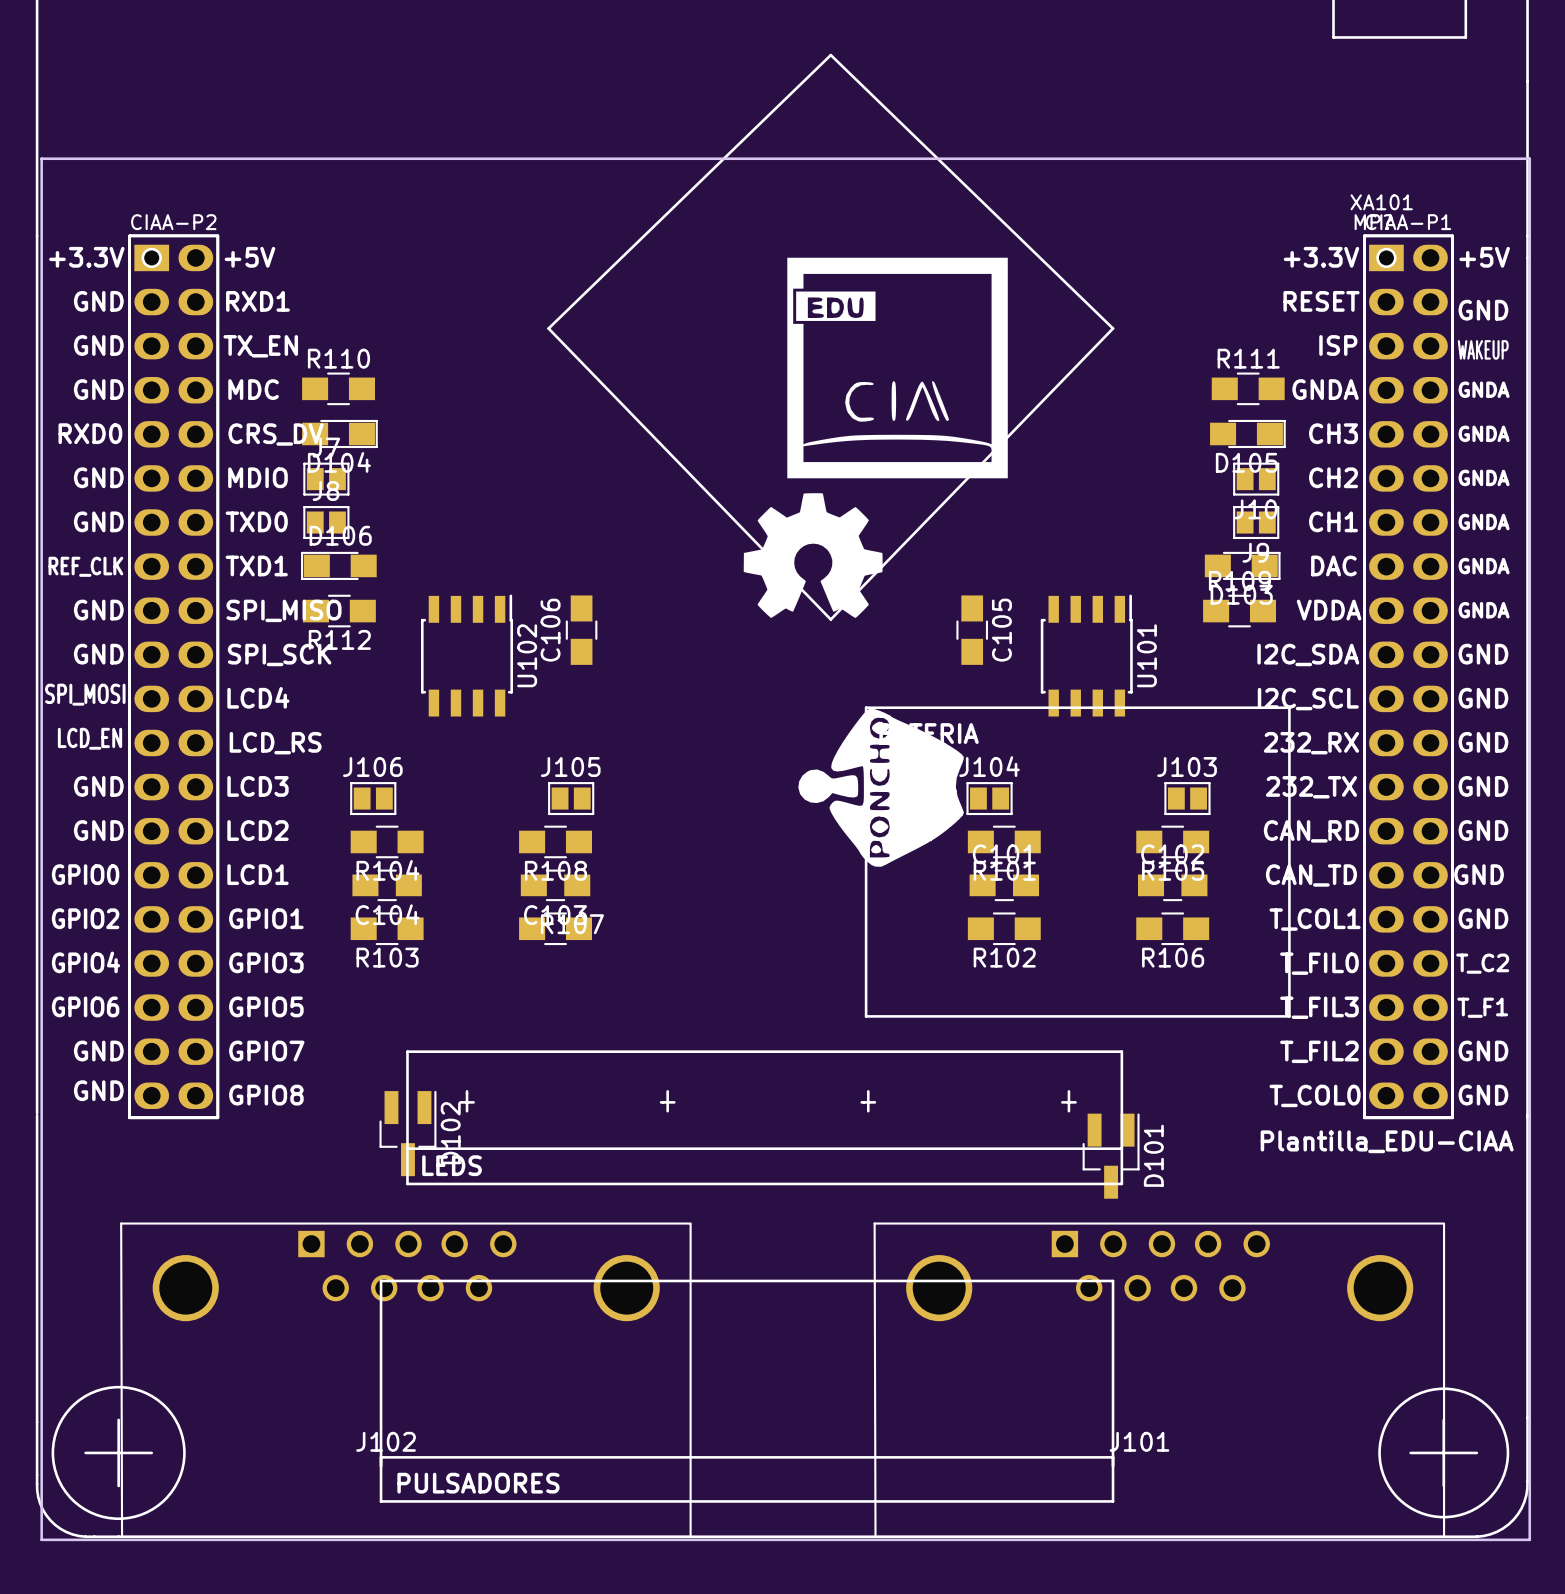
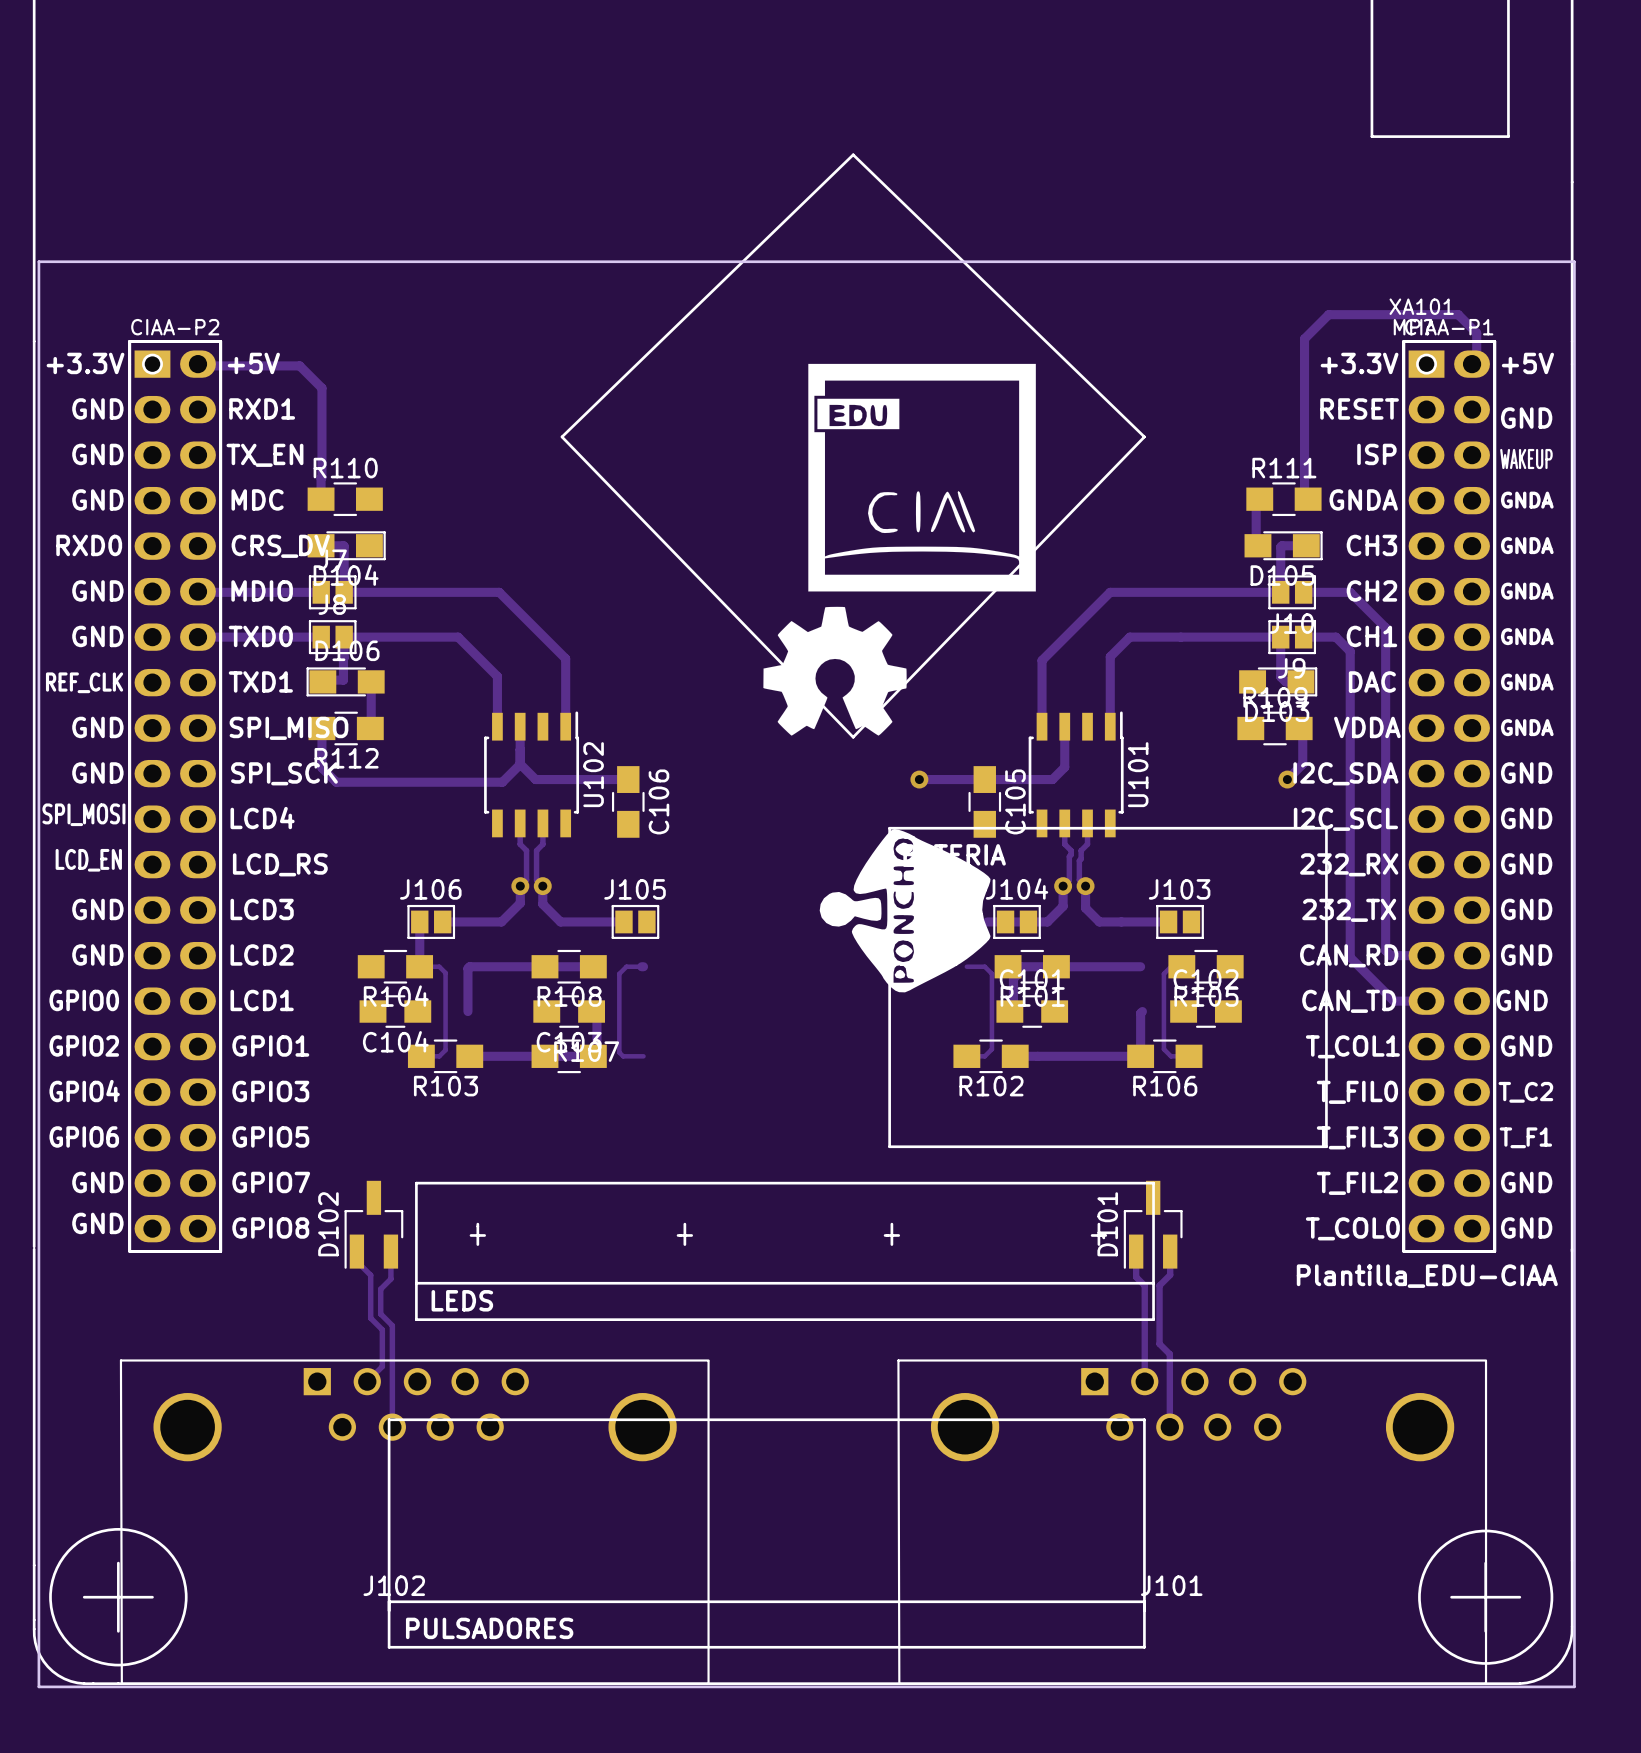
track: none -> (202, 365) (299, 365) (321, 388) (321, 499)
track: none -> (1476, 365) (1476, 333) (1458, 314) (1328, 314) (1304, 338) (1304, 499)
track: none -> (1256, 499) (1256, 545)
track: none -> (321, 545) (344, 546) (344, 592) (499, 592) (565, 658) (565, 726)
track: none -> (1304, 545) (1280, 547) (1280, 592) (1110, 592) (1042, 660) (1042, 726)
track: none -> (321, 592) (202, 593)
track: none -> (1303, 592) (1350, 592) (1385, 627) (1385, 950) (1390, 955) (1426, 955)
track: none -> (321, 637) (204, 637) (202, 638)
track: none -> (1303, 637) (1335, 637) (1350, 651) (1350, 957) (1393, 1001) (1426, 1001)
track: none -> (322, 681) (324, 680) (343, 680) (344, 637) (458, 637) (497, 676) (497, 726)
track: none -> (371, 681) (370, 728)
track: none -> (1300, 681) (1285, 681) (1280, 676) (1280, 637) (1129, 637) (1110, 656) (1110, 726)
track: none -> (520, 726) (520, 764) (502, 782) (336, 782) (321, 767) (321, 728)
track: none -> (1064, 726) (1064, 767) (1052, 779) (919, 779)
track: none -> (1302, 728) (1302, 764) (1287, 779)
C106 name position: C106 (550, 630) -> C106 (658, 801)
C106 position: (581, 630) -> (628, 801)
C105 position: (972, 630) -> (984, 801)
track: none -> (520, 764) (535, 779) (628, 779)
U102 position: (467, 655) -> (531, 774)
U101 position: (1086, 655) -> (1076, 774)
via: none -> (919, 779)
via: none -> (1287, 779)
track: none -> (520, 823) (520, 844) (526, 850) (526, 879) (520, 886) (520, 903) (501, 921) (442, 921)
track: none -> (542, 823) (542, 844) (536, 850) (536, 879) (542, 886) (542, 904) (560, 921) (623, 921)
track: none -> (1064, 823) (1064, 844) (1071, 850) (1071, 854) (1069, 856) (1069, 879) (1063, 886) (1063, 906) (1047, 921) (987, 921)
track: none -> (1087, 823) (1087, 844) (1081, 850) (1079, 860) (1079, 879) (1085, 886) (1085, 908) (1099, 921) (1168, 921)
via: none -> (520, 886)
via: none -> (542, 886)
via: none -> (1063, 886)
via: none -> (1085, 886)
J106 position: (373, 798) -> (431, 921)
track: none -> (419, 921) (419, 965) (439, 966) (445, 972) (445, 1050) (439, 1056) (421, 1056)
J105 position: (571, 798) -> (635, 921)
J103 position: (1187, 798) -> (1180, 921)
track: none -> (595, 966) (469, 966) (467, 968) (467, 1011)
track: none -> (641, 966) (643, 966) (626, 966) (619, 973) (619, 1052) (623, 1056) (643, 1056)
track: none -> (966, 966) (984, 966) (991, 973) (991, 1049) (984, 1056) (966, 1056)
track: none -> (1140, 966) (1020, 966) (1020, 971) (1013, 978) (1013, 1011)
track: none -> (1189, 966) (1171, 966) (1163, 973) (1163, 1049) (1171, 1056) (1189, 1056)
track: none -> (596, 1011) (596, 1054) (595, 1056) (469, 1056)
track: none -> (1142, 1011) (1140, 1013) (1140, 1056) (1015, 1056)
R103 position: (387, 928) -> (445, 1056)
R102 position: (1004, 928) -> (991, 1056)
R106 position: (1172, 928) -> (1164, 1056)
track: none -> (356, 1251) (356, 1261) (370, 1275) (370, 1318) (382, 1329) (382, 1366) (367, 1381)
track: none -> (390, 1251) (390, 1278) (380, 1289) (380, 1314) (392, 1325) (392, 1427)
track: none -> (1136, 1251) (1136, 1277) (1144, 1285) (1144, 1381)
track: none -> (1170, 1251) (1170, 1274) (1159, 1285) (1159, 1343) (1169, 1354) (1169, 1427)
D102 rotation: 0° (407, 1133) -> 180° (373, 1224)
D102 position: (407, 1133) -> (373, 1224)
D101 rotation: 0° (1111, 1156) -> 180° (1153, 1224)
D101 position: (1111, 1156) -> (1153, 1224)

